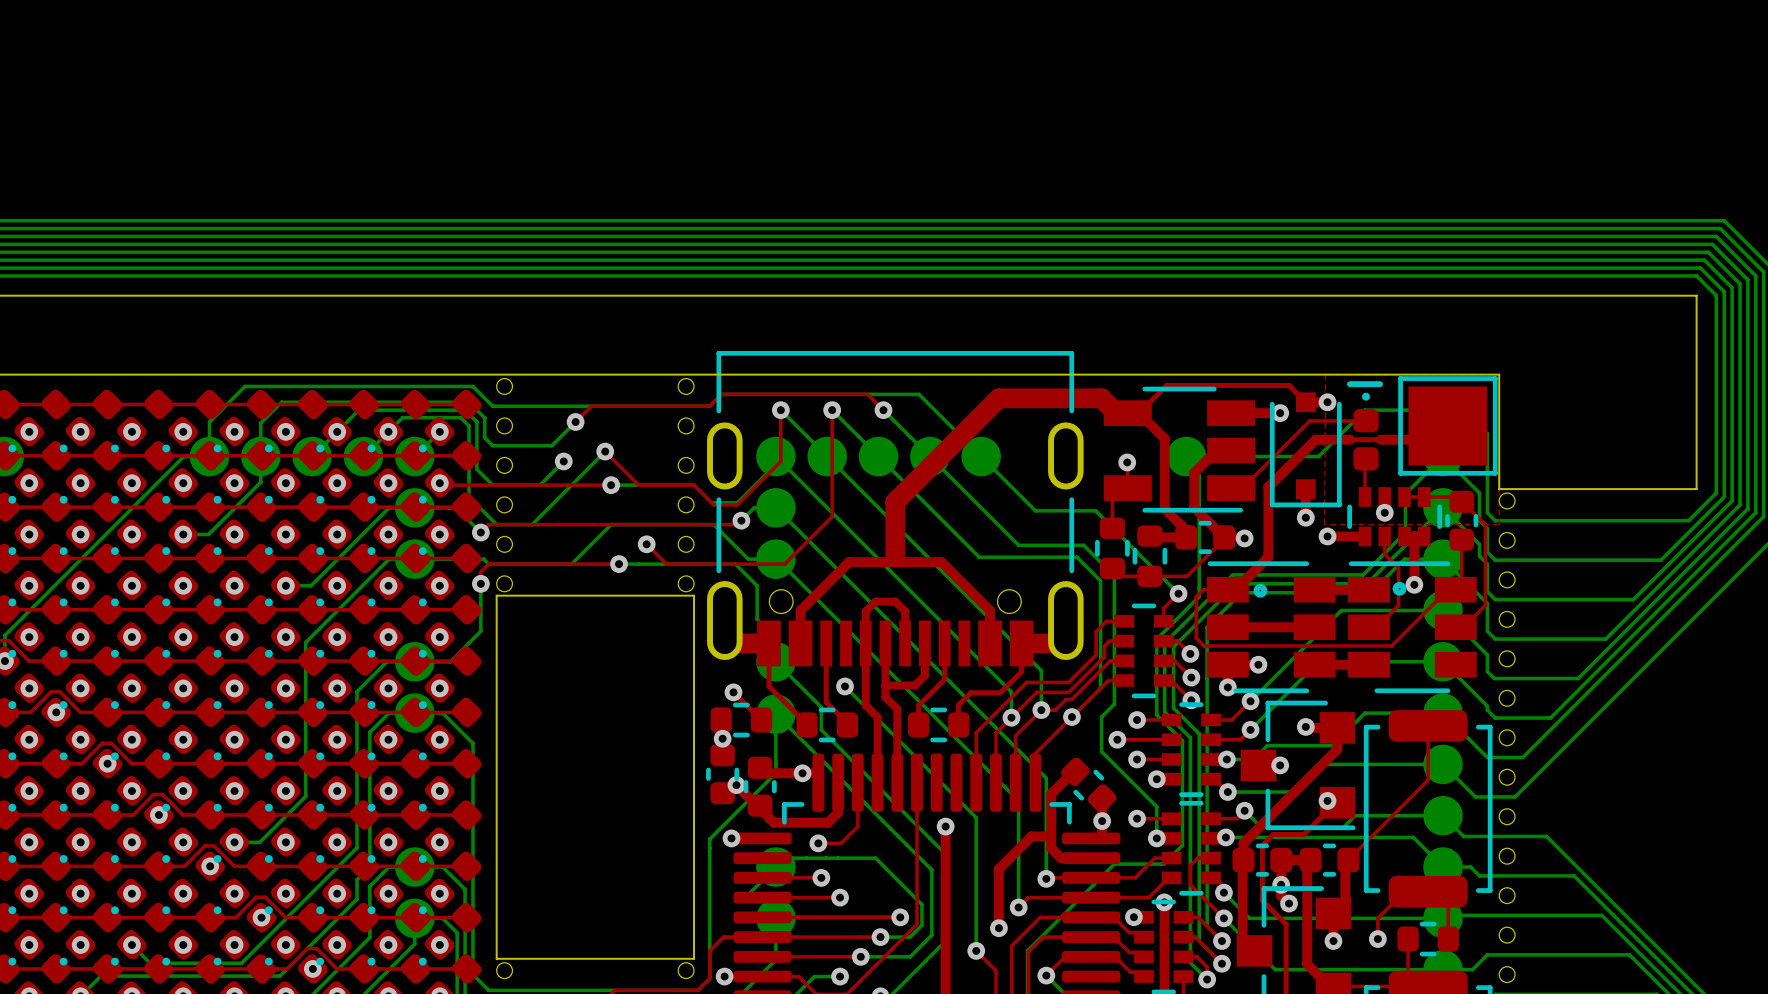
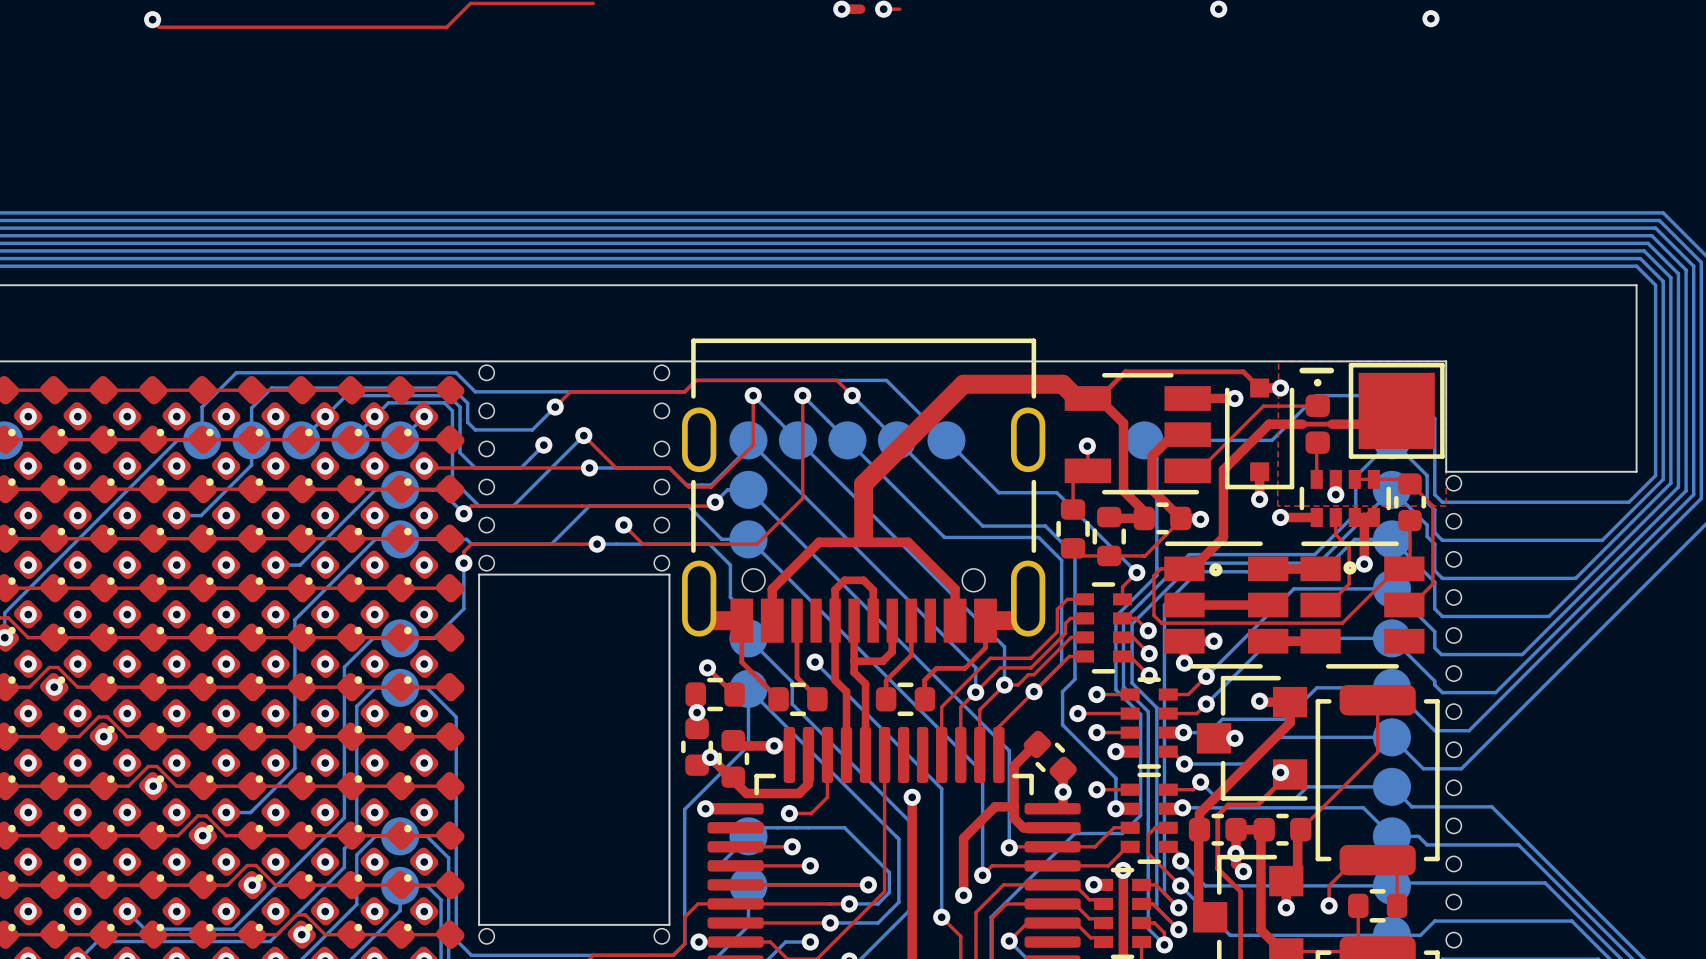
top track: none -> (593, 3) (470, 3) (446, 27) (159, 27) (152, 19)
top track: none -> (841, 9) (860, 9)
via: none -> (841, 9)
top track: none -> (883, 9) (899, 9)
via: none -> (883, 9)
via: none -> (1218, 9)
via: none -> (1430, 18)
via: none -> (152, 19)

